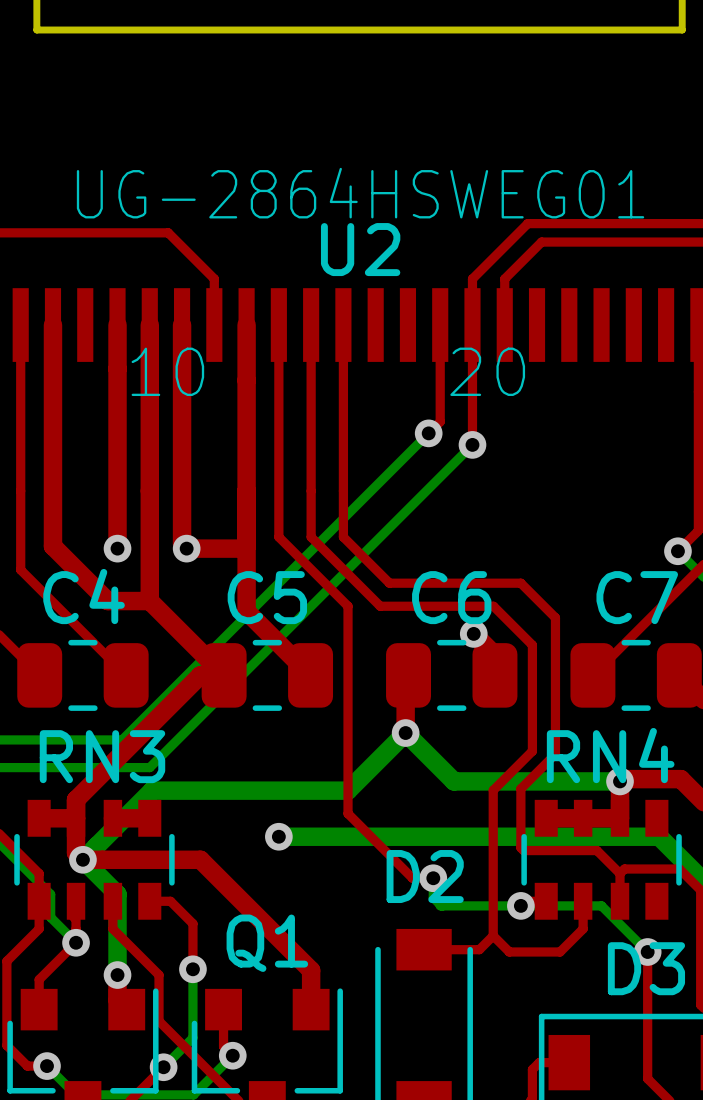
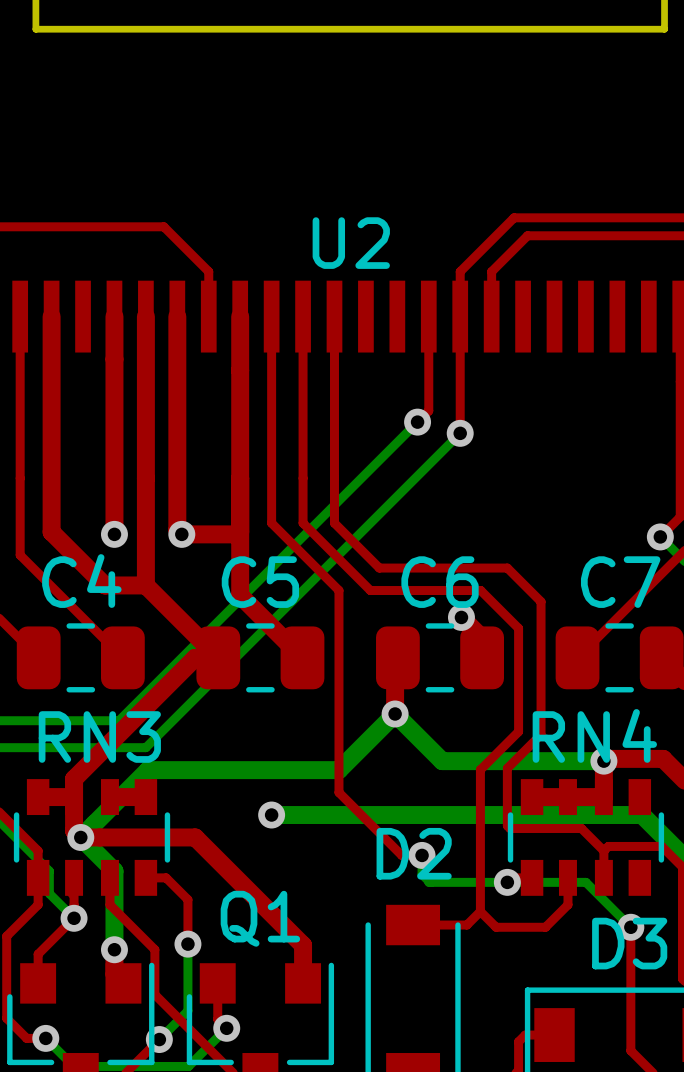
U2 value: UG-2864HSWEG01 (360, 193) -> none
U2 text: 10 (167, 371) -> none
U2 text: 20 (487, 371) -> none

